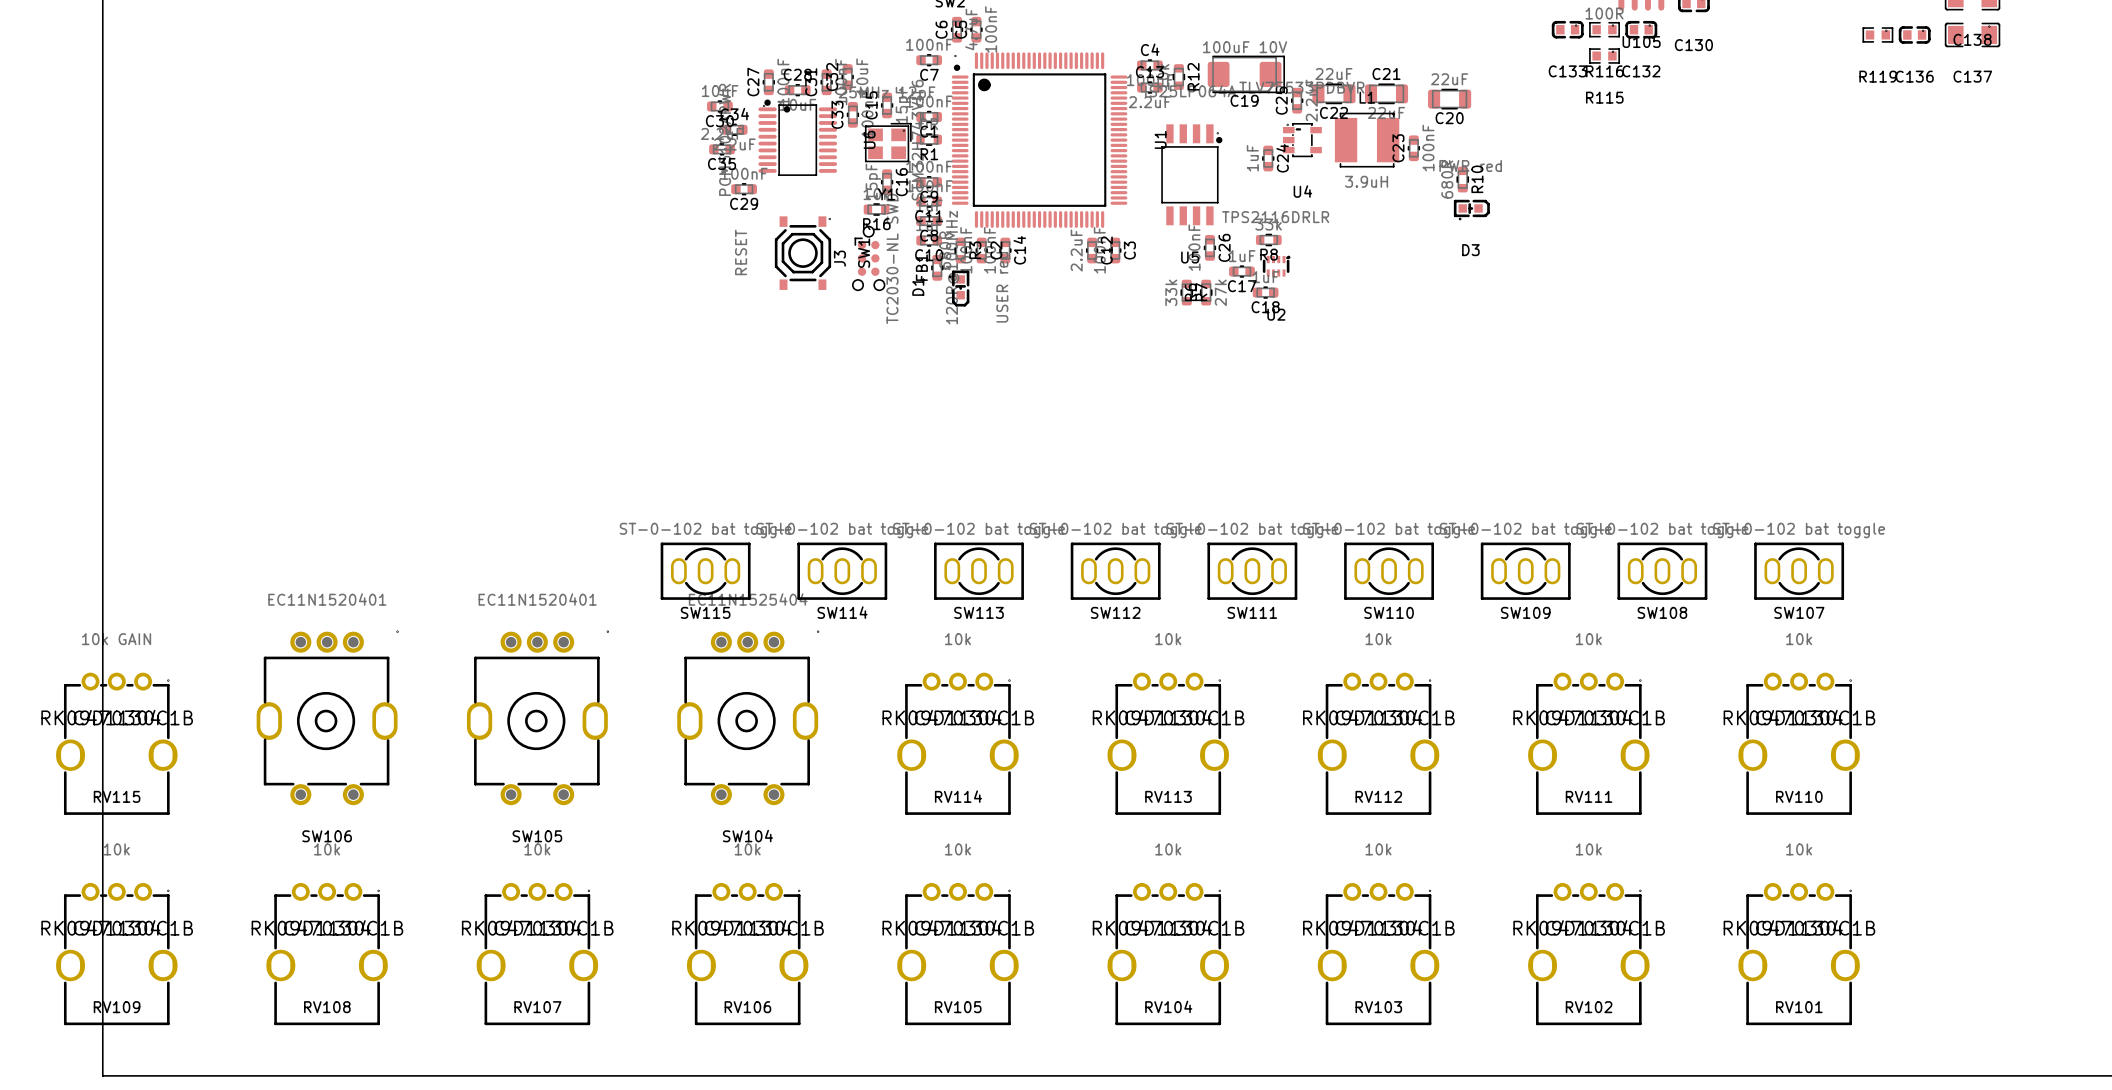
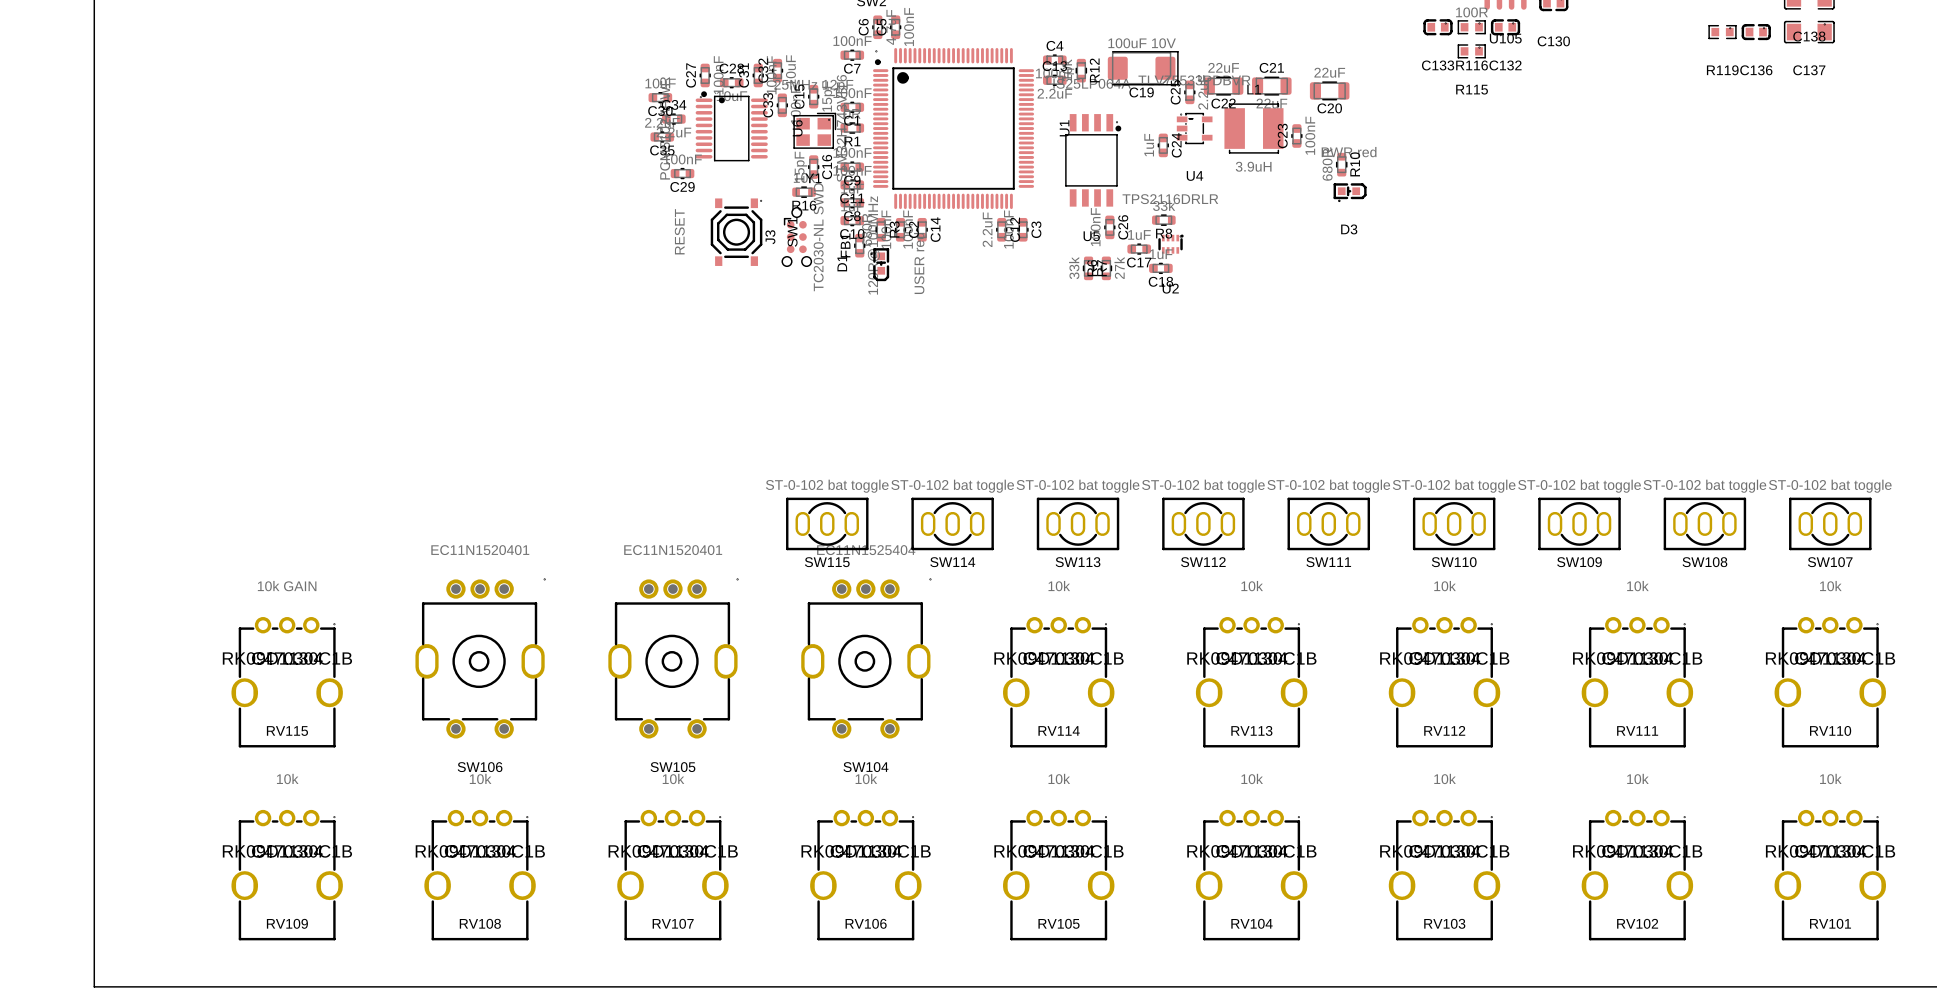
SW115 position: (705, 571) -> (827, 523)
SW114 position: (842, 571) -> (952, 523)
SW113 position: (978, 571) -> (1078, 523)
SW112 position: (1115, 571) -> (1203, 523)
SW111 position: (1252, 571) -> (1328, 523)
SW110 position: (1389, 571) -> (1454, 523)
SW109 position: (1525, 571) -> (1579, 523)
SW108 position: (1662, 571) -> (1704, 523)
SW107 position: (1799, 571) -> (1830, 523)
SW106 position: (327, 718) -> (480, 658)
SW105 position: (537, 718) -> (673, 658)
SW104 position: (747, 718) -> (866, 658)
RV115 position: (116, 743) -> (287, 682)
RV114 position: (957, 743) -> (1058, 682)
RV113 position: (1168, 743) -> (1251, 682)
RV112 position: (1378, 743) -> (1444, 682)
RV111 position: (1588, 743) -> (1637, 682)
RV110 position: (1799, 743) -> (1830, 682)
RV109 position: (116, 954) -> (287, 875)
RV108 position: (327, 954) -> (480, 875)
RV107 position: (537, 954) -> (672, 875)
RV106 position: (747, 954) -> (865, 875)
RV105 position: (957, 954) -> (1058, 875)
RV104 position: (1168, 954) -> (1251, 875)
RV103 position: (1378, 954) -> (1444, 875)
RV102 position: (1588, 954) -> (1637, 875)
RV101 position: (1799, 954) -> (1830, 875)

